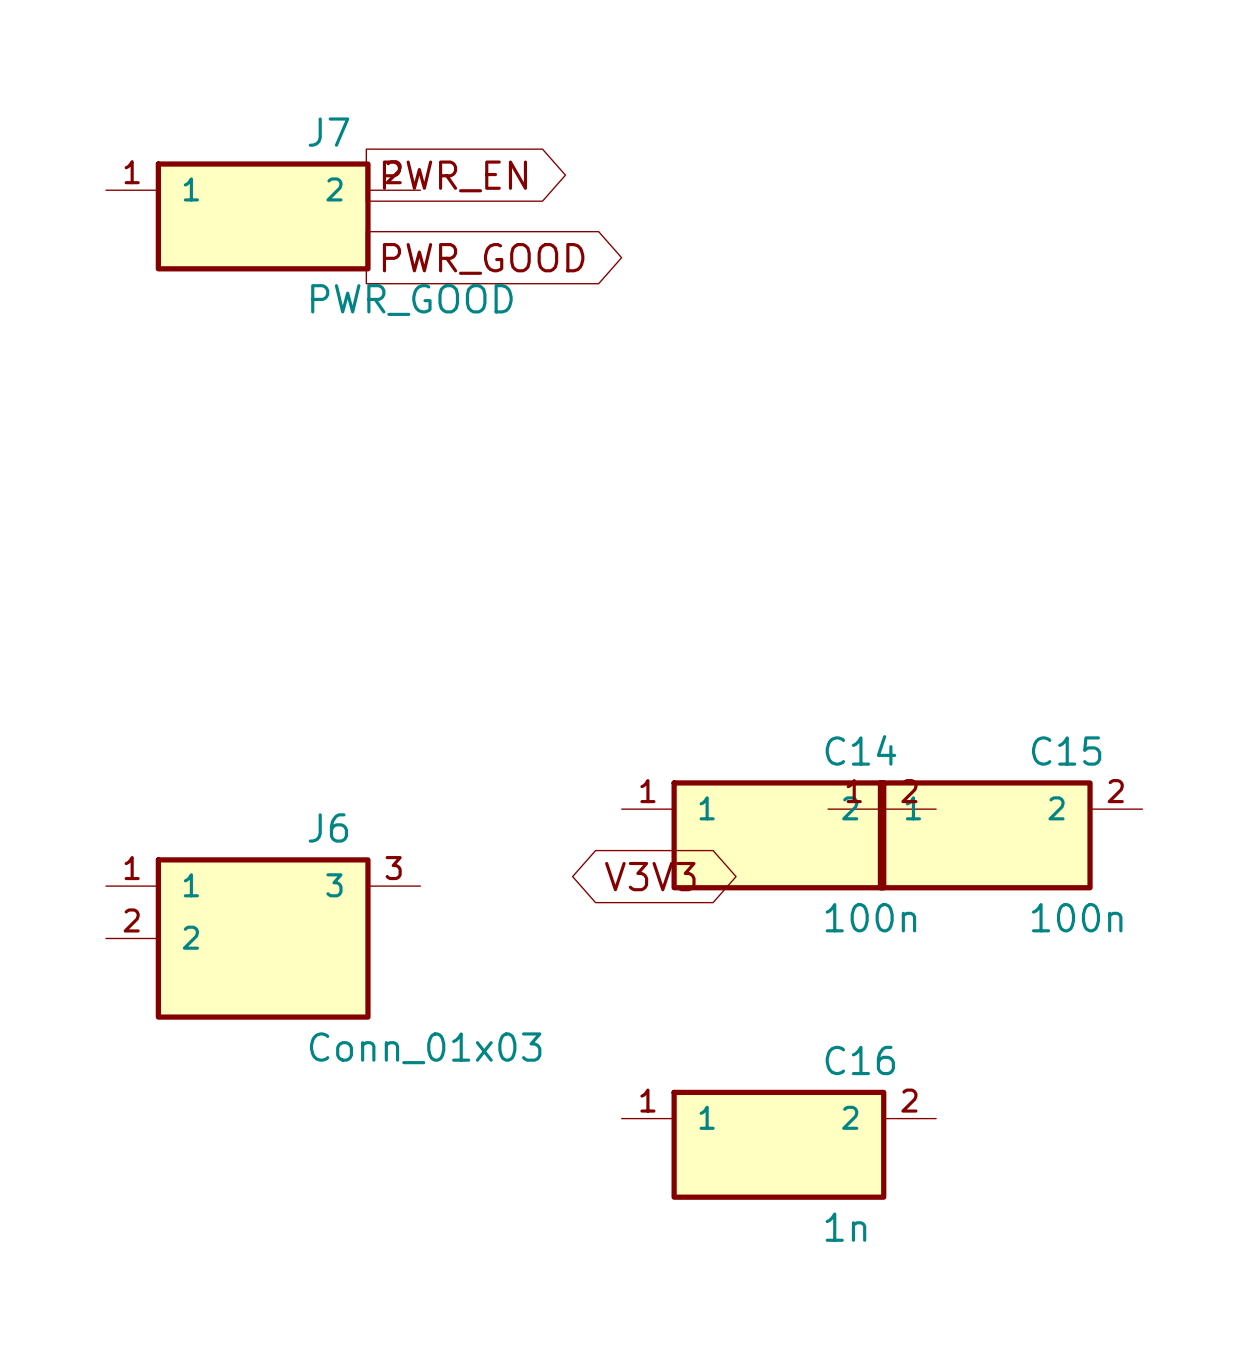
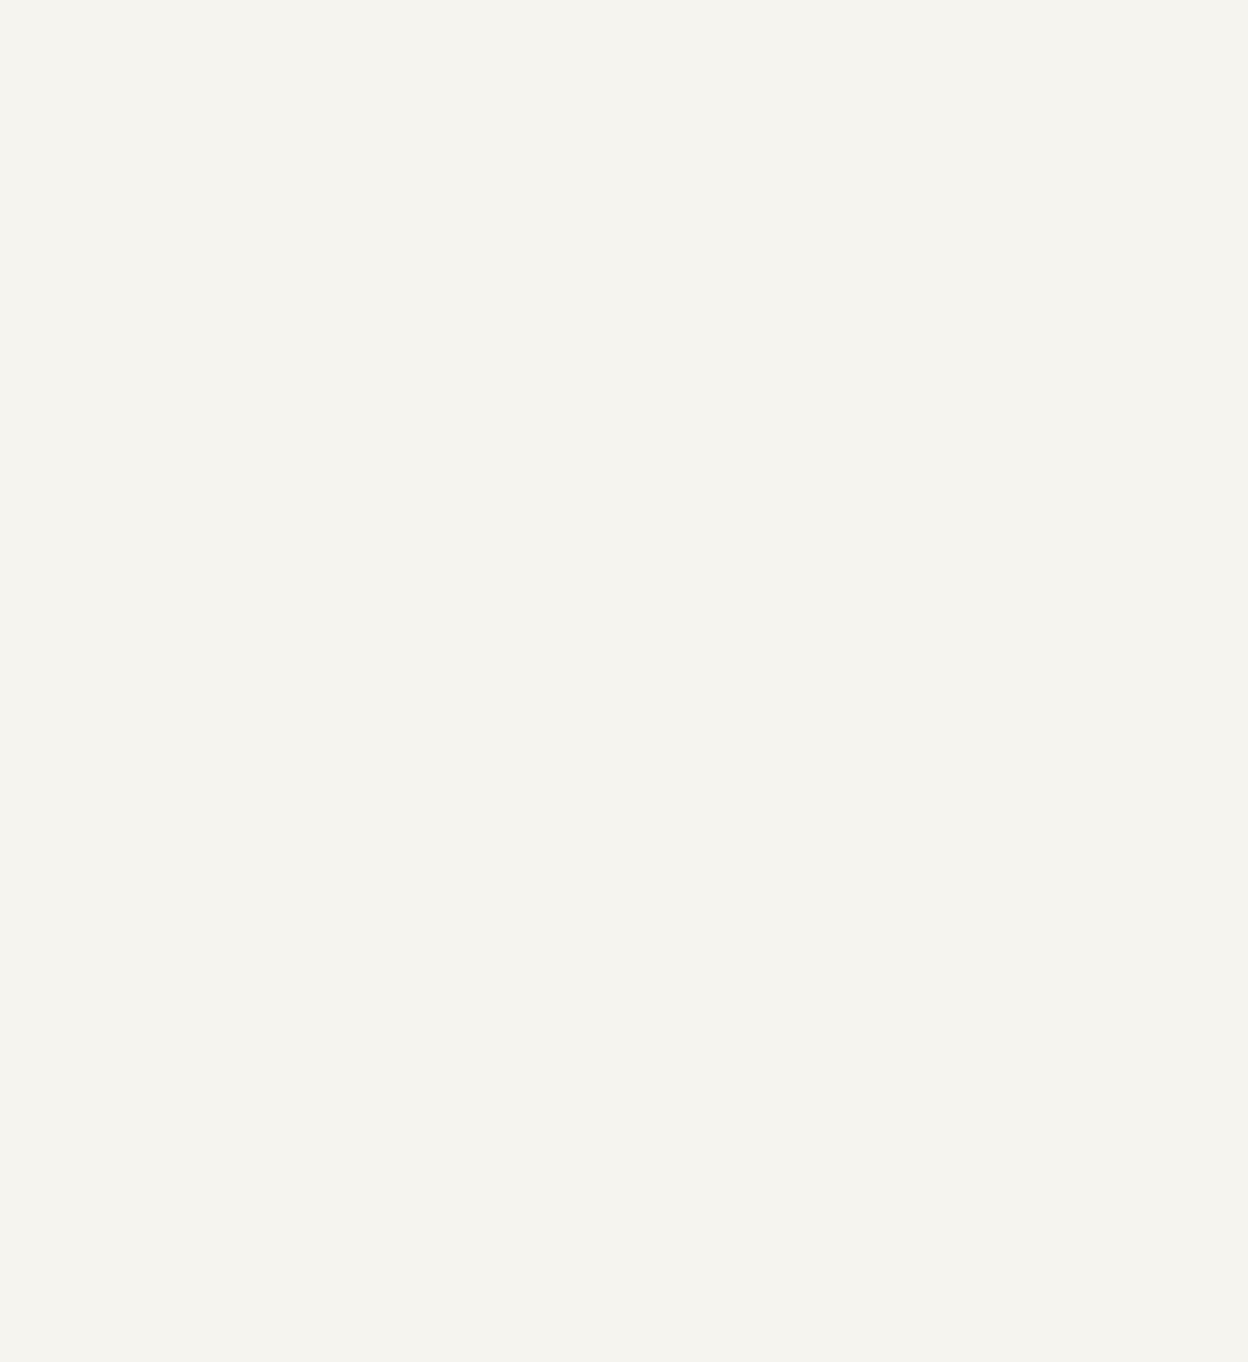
global label: PWR_EN (454, 176) -> none
J7: PWR_GOOD (263, 216) -> none
global label: PWR_GOOD (483, 258) -> none
C14: 100n (778, 835) -> none
C15: 100n (985, 835) -> none
global label: V3V3 (650, 876) -> none
J6: Conn_01x03 (263, 938) -> none
C16: 1n (778, 1144) -> none

